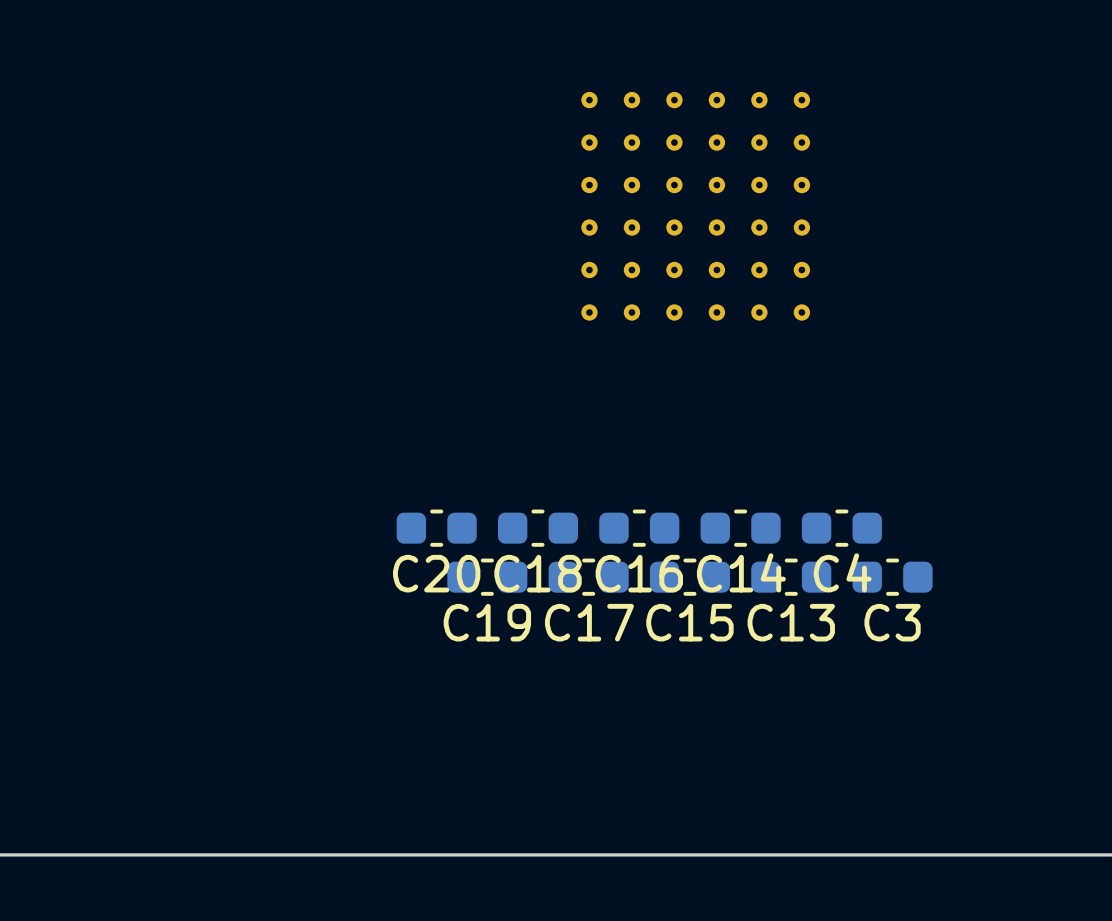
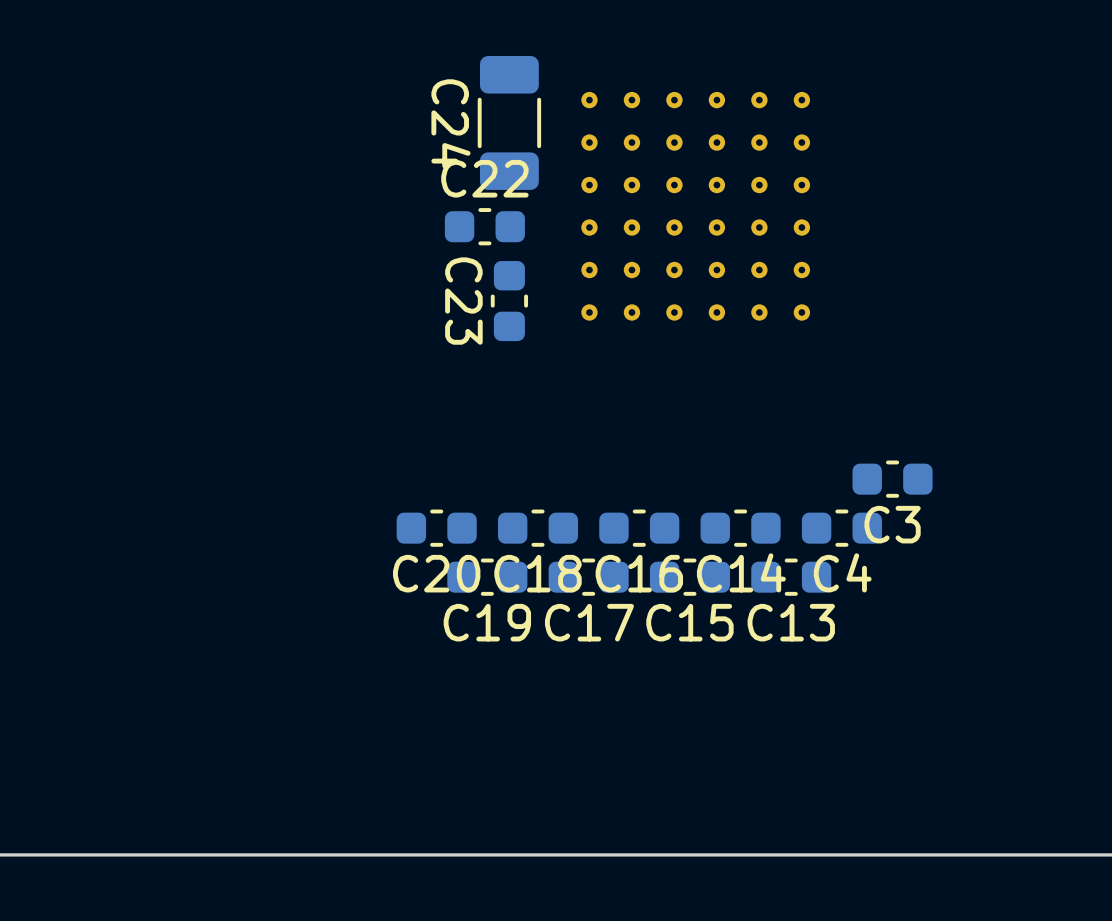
C24: none -> (509, 122)
C22: none -> (484, 226)
C23: none -> (509, 301)
C3 position: (892, 577) -> (892, 479)

